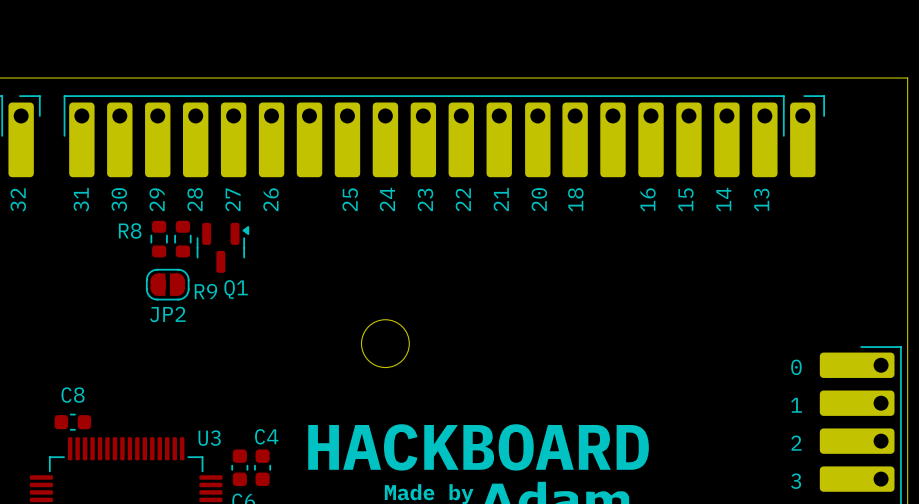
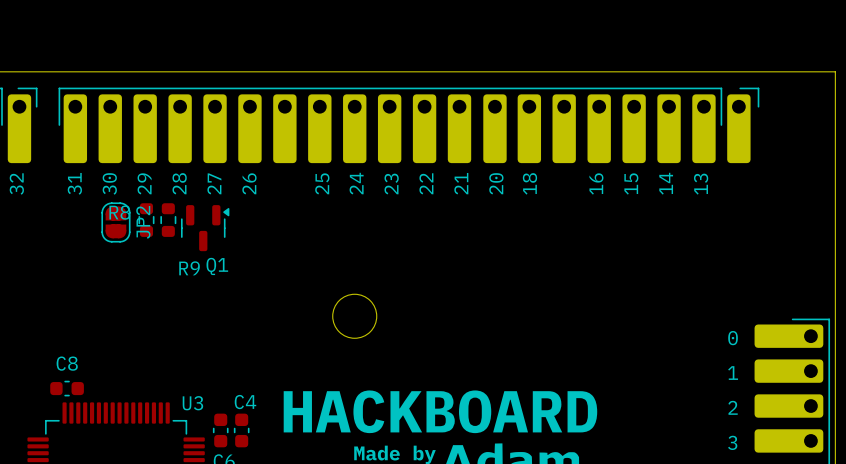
JP2 rotation: 0° (167, 284) -> 90° clockwise (115, 222)
JP2 position: (167, 284) -> (115, 222)
JP2 name position: JP2 (167, 314) -> JP2 (143, 222)

